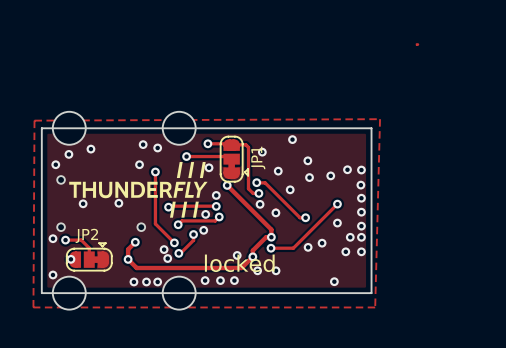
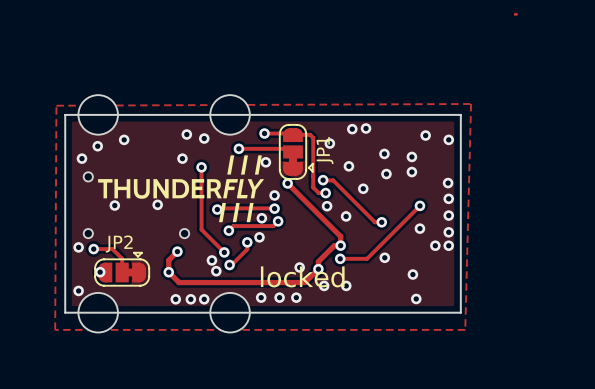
via: none -> (352, 129)
via: none -> (425, 135)
via: none -> (448, 139)
via: none -> (411, 156)
via: (347, 169) -> none
via: (361, 170) -> none
via: (322, 243) -> none
via: (345, 251) -> none
via: (361, 251) -> none
via: none -> (412, 274)

